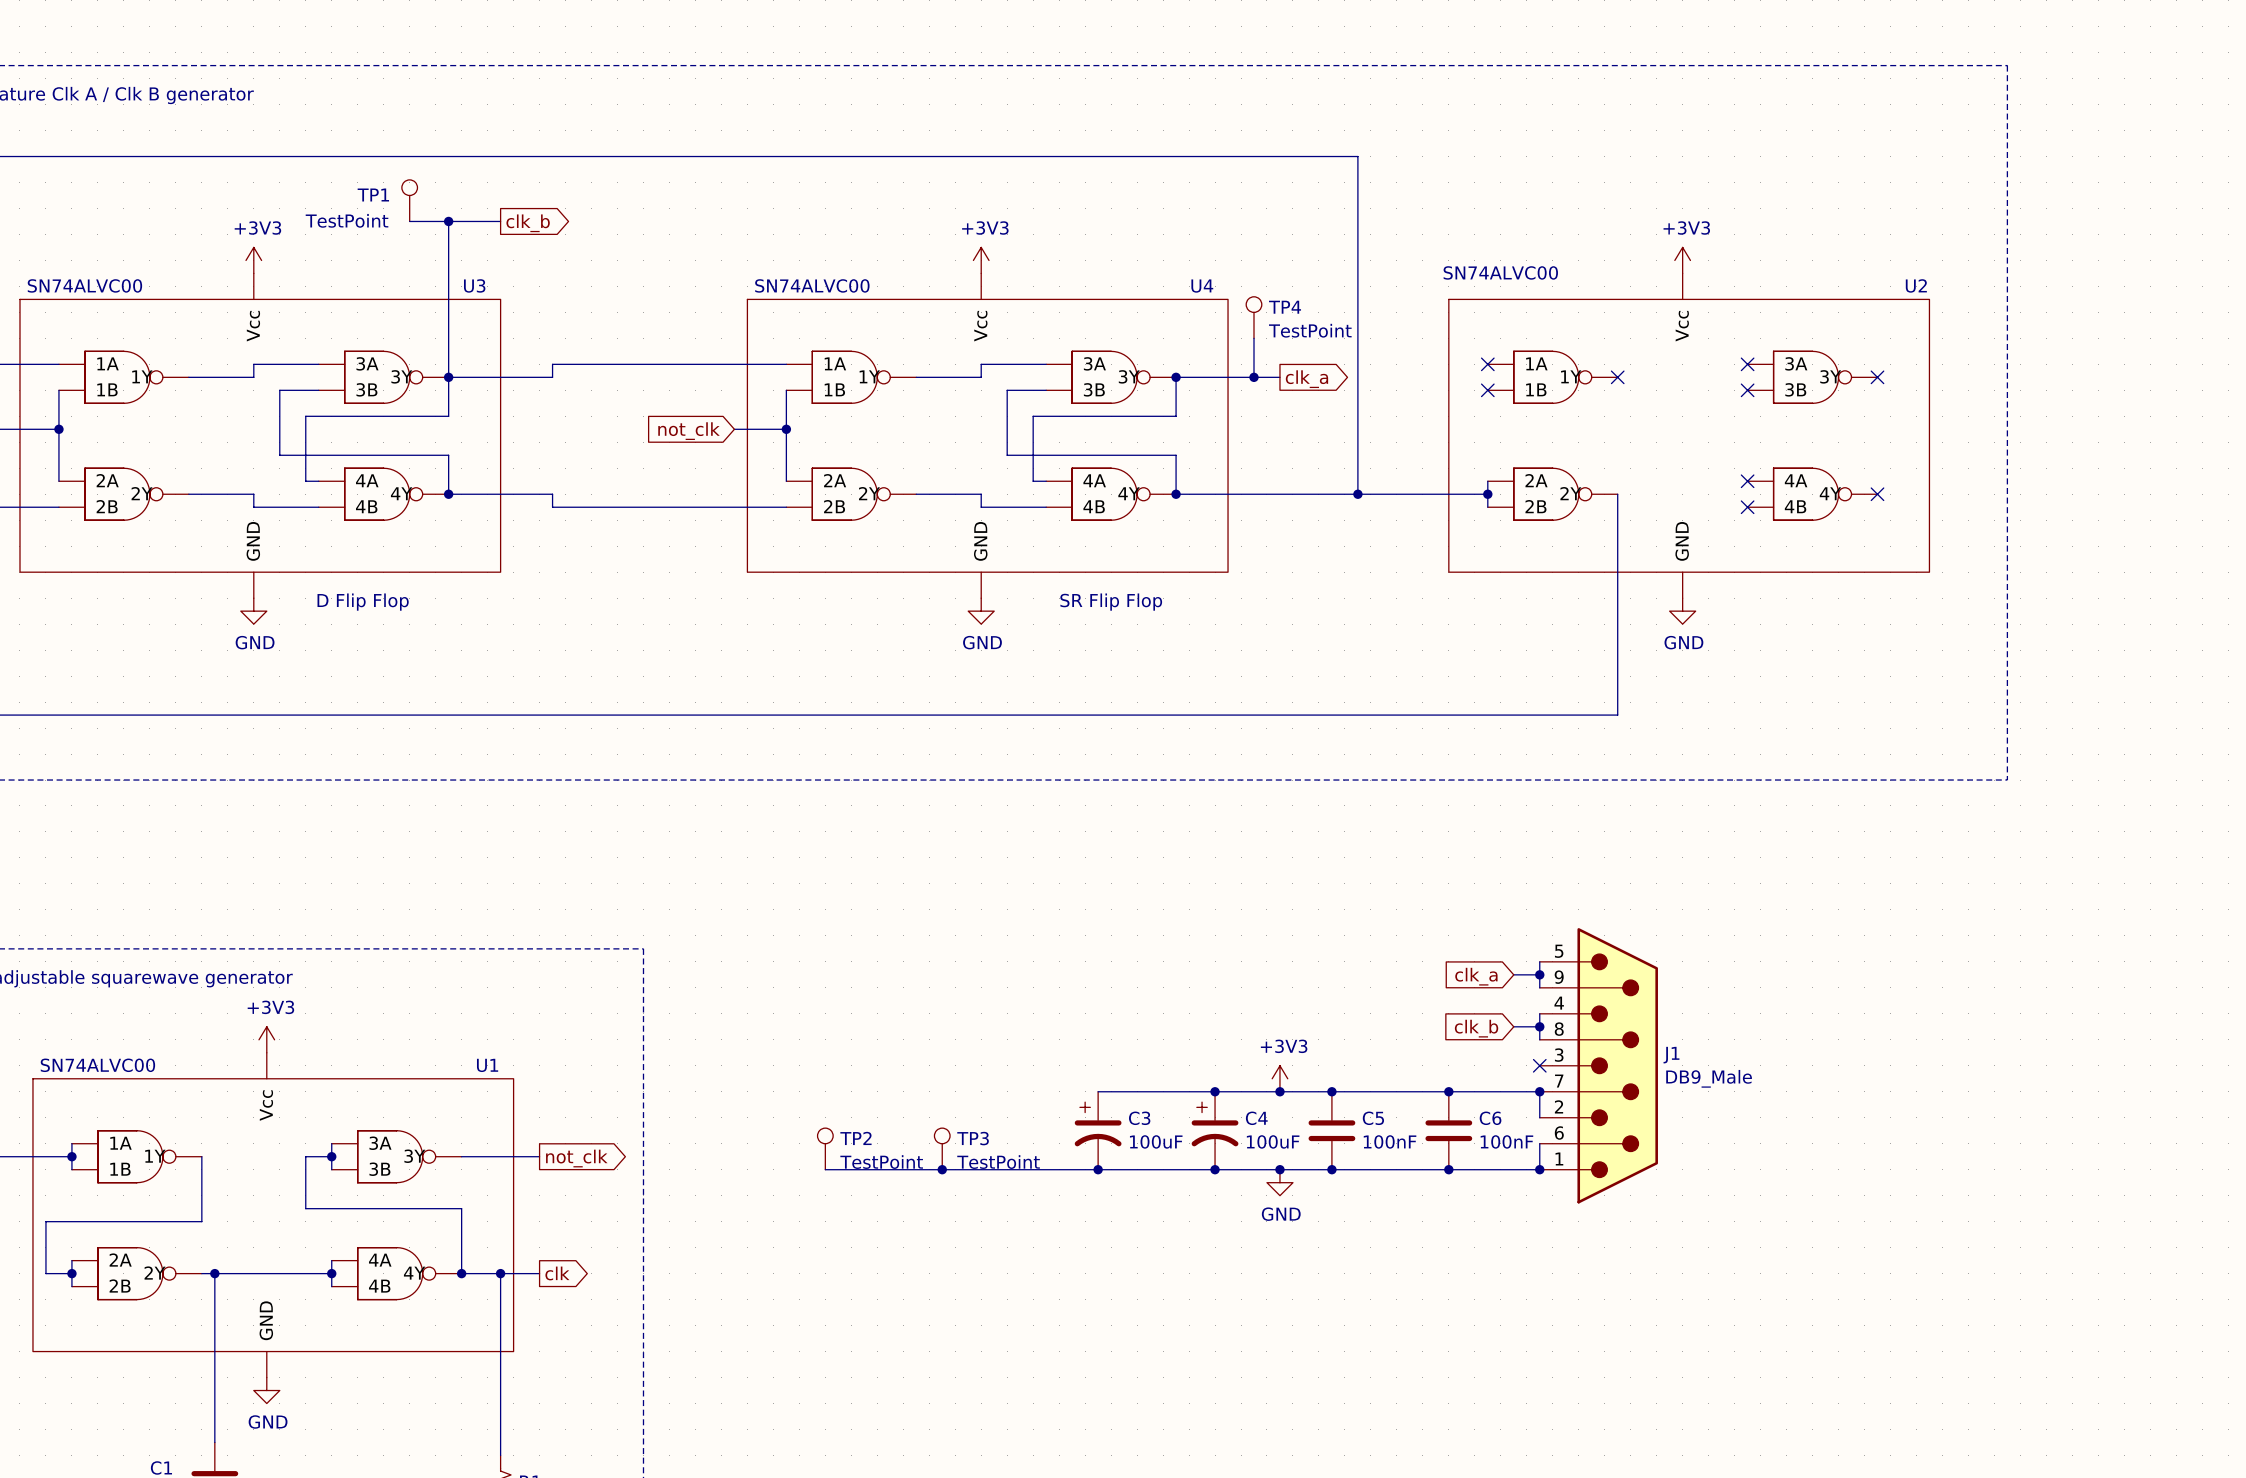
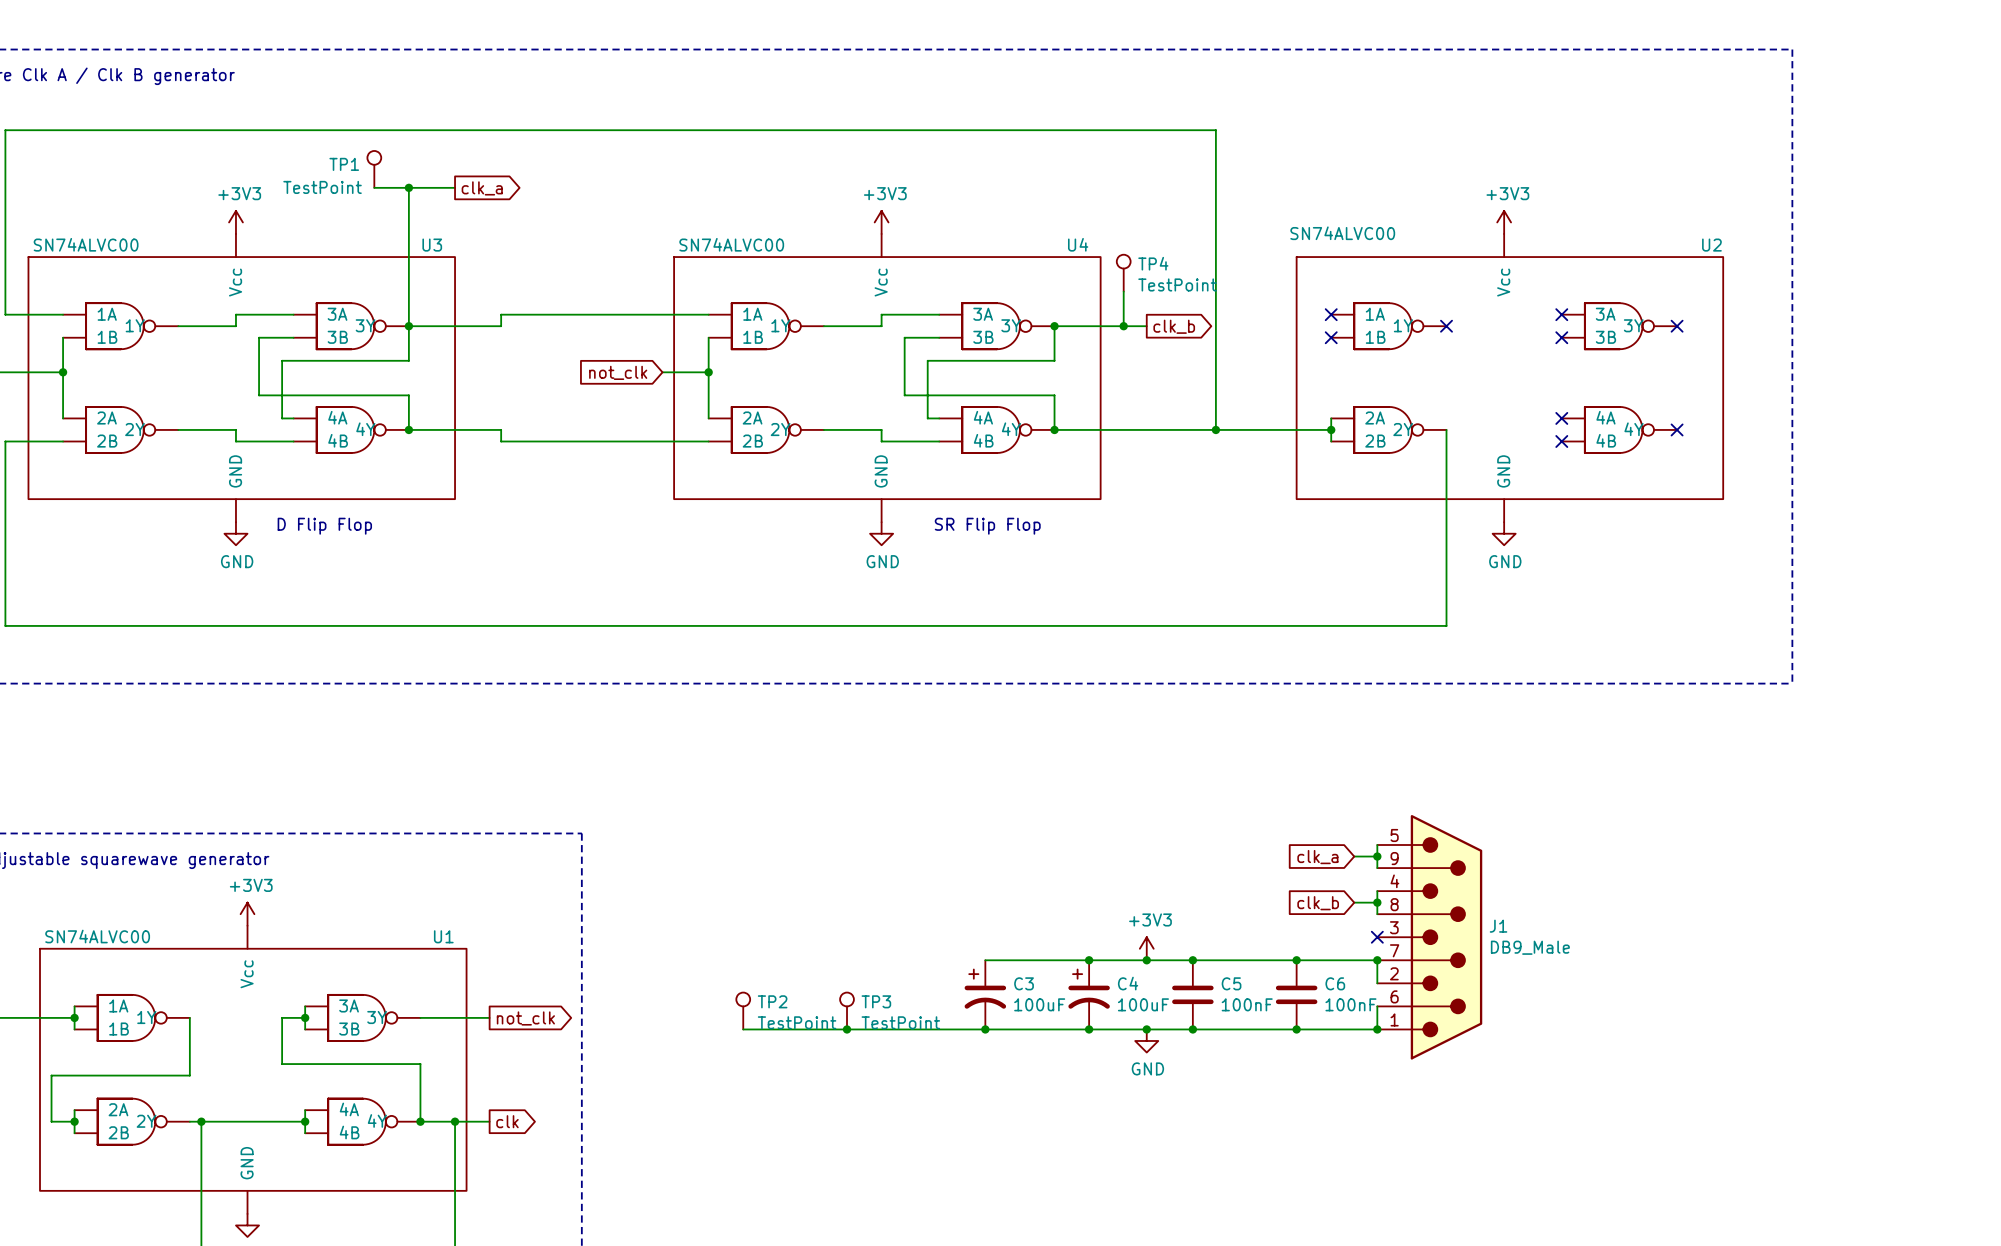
global label: clk_b (528, 223) -> clk_a (482, 188)
global label: clk_a (1306, 379) -> clk_b (1174, 326)

